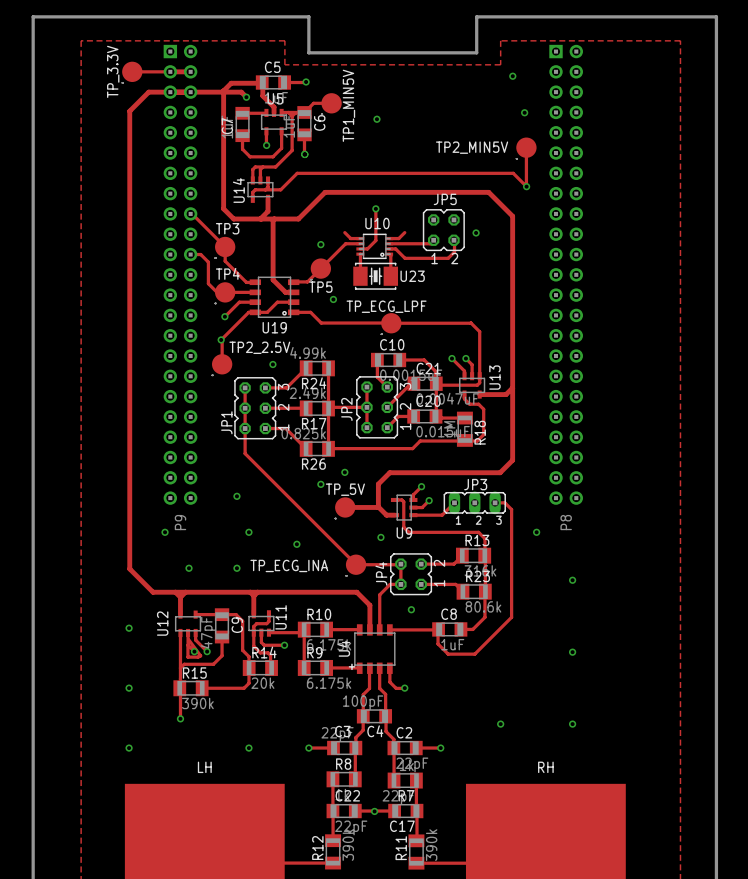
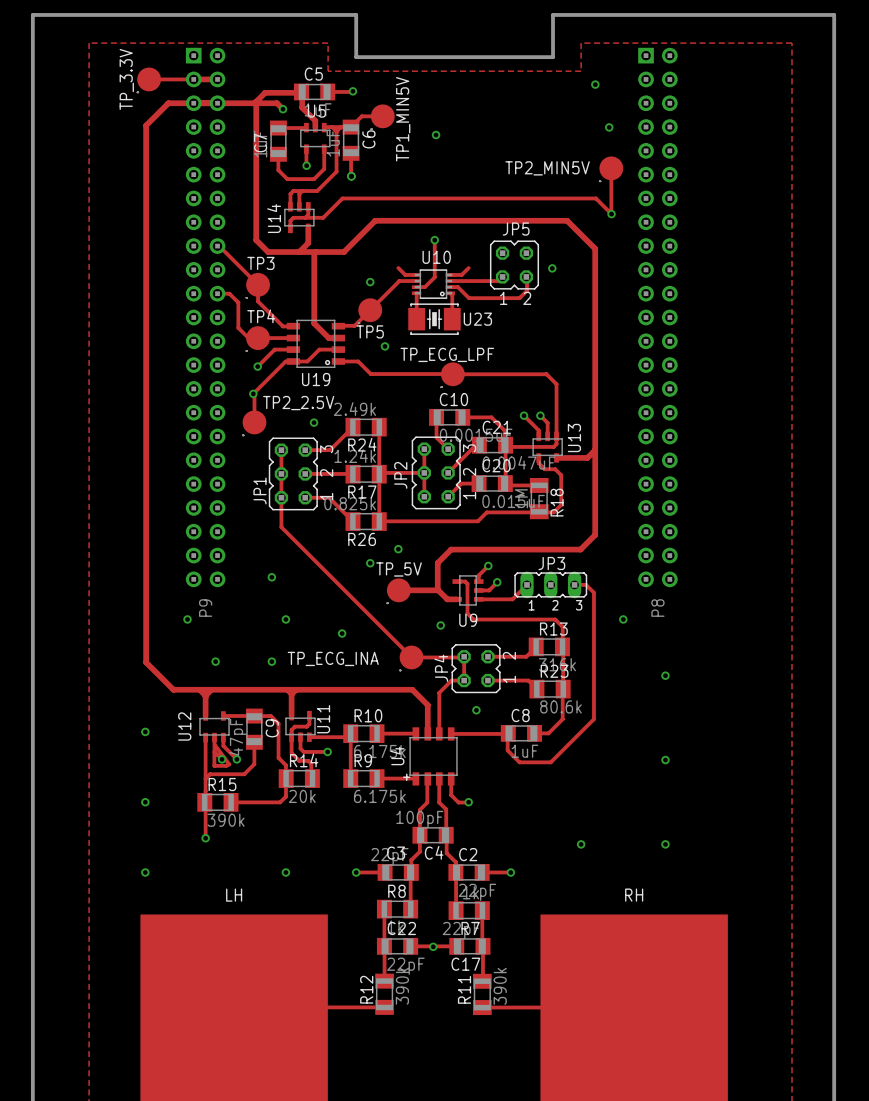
R24 value: 4.99k (308, 352) -> 2.49k (354, 409)
R17 value: 2.49k (307, 392) -> 1.24k (355, 456)

